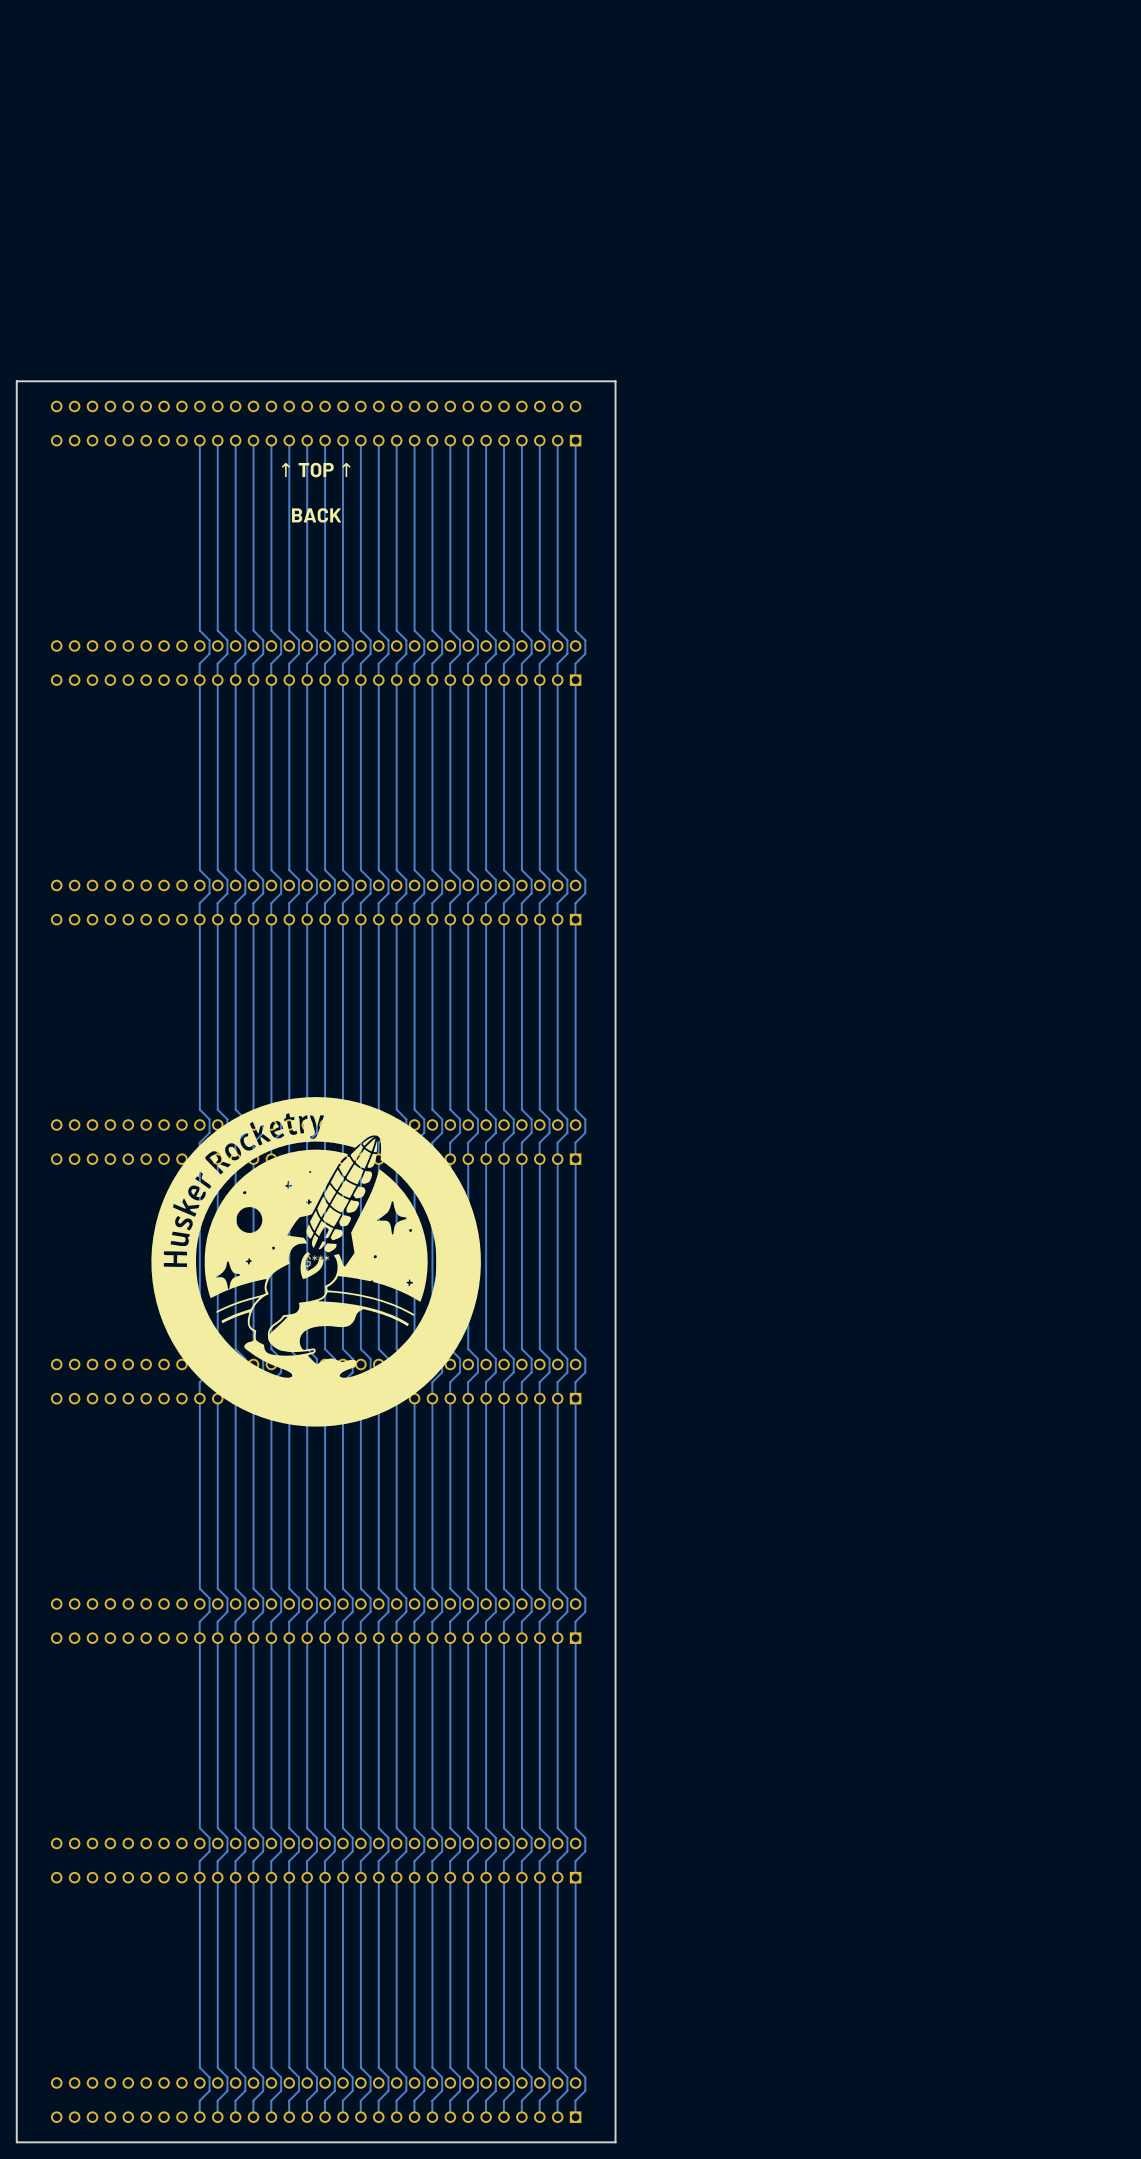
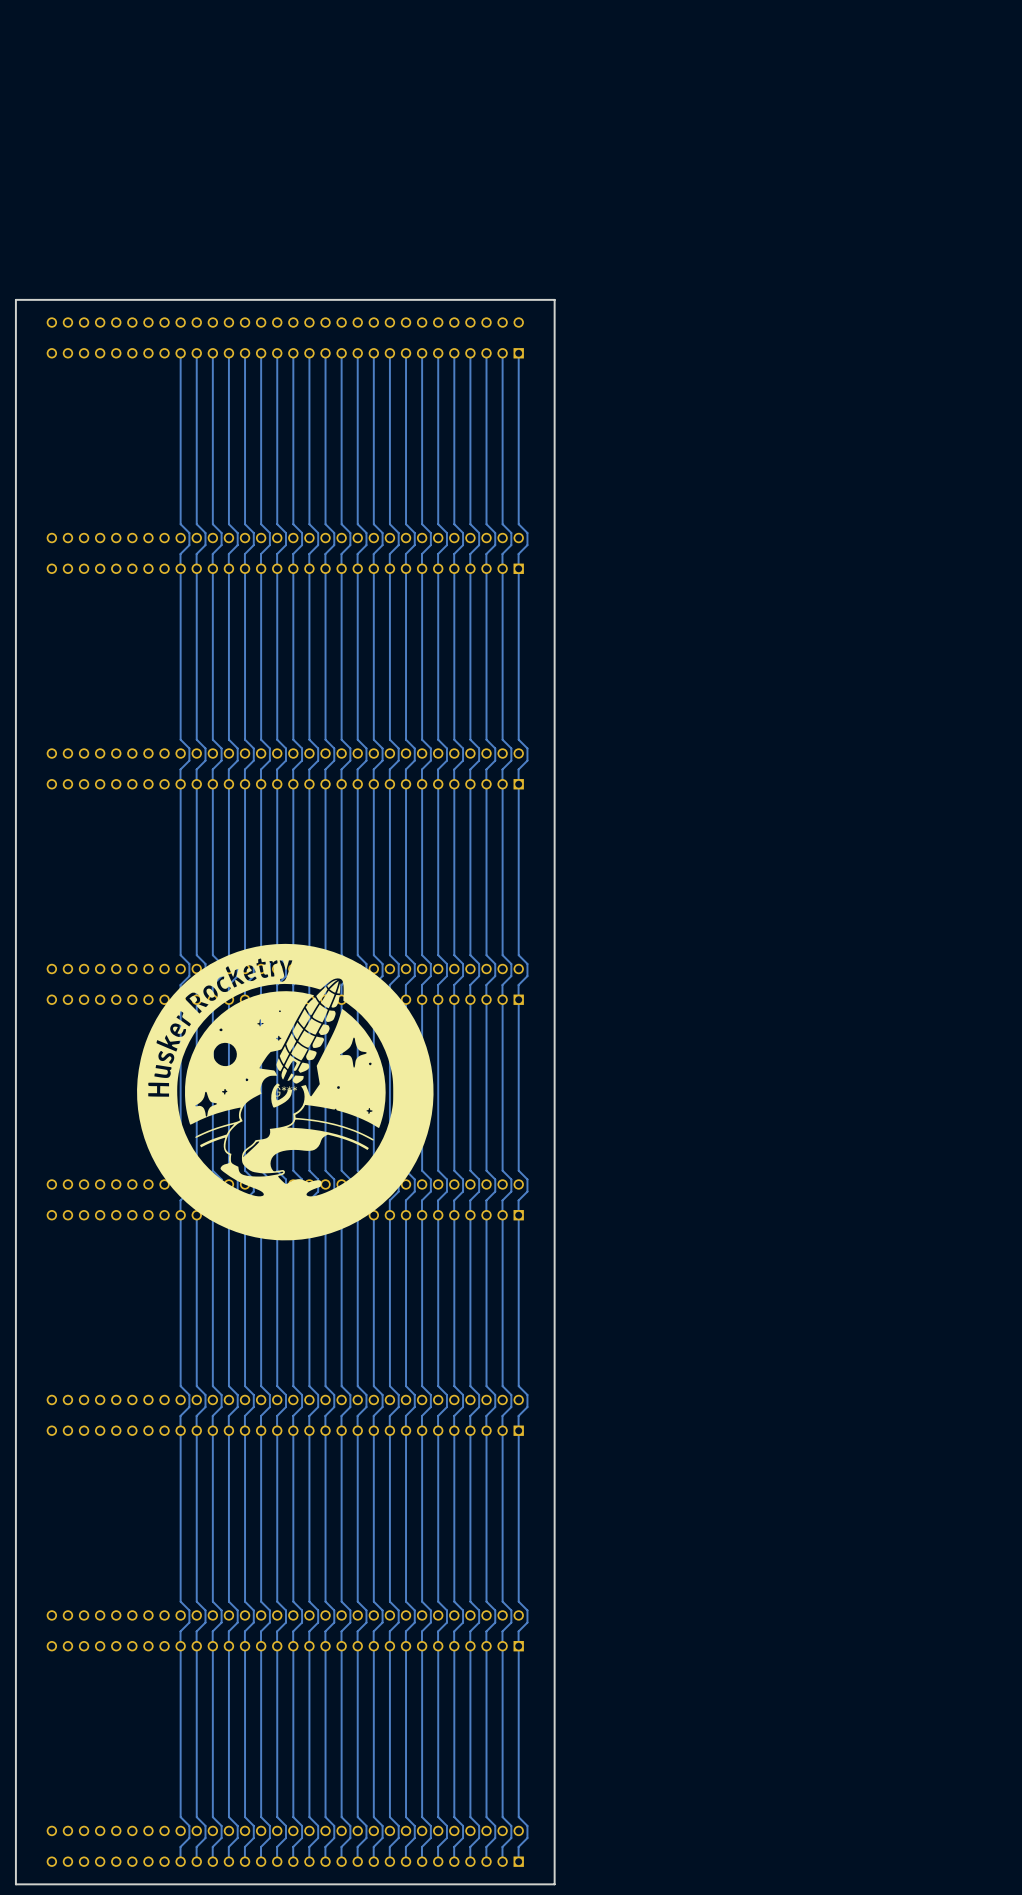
text: ↑ TOP ↑ (316, 470) -> none
text: BACK (316, 515) -> none

